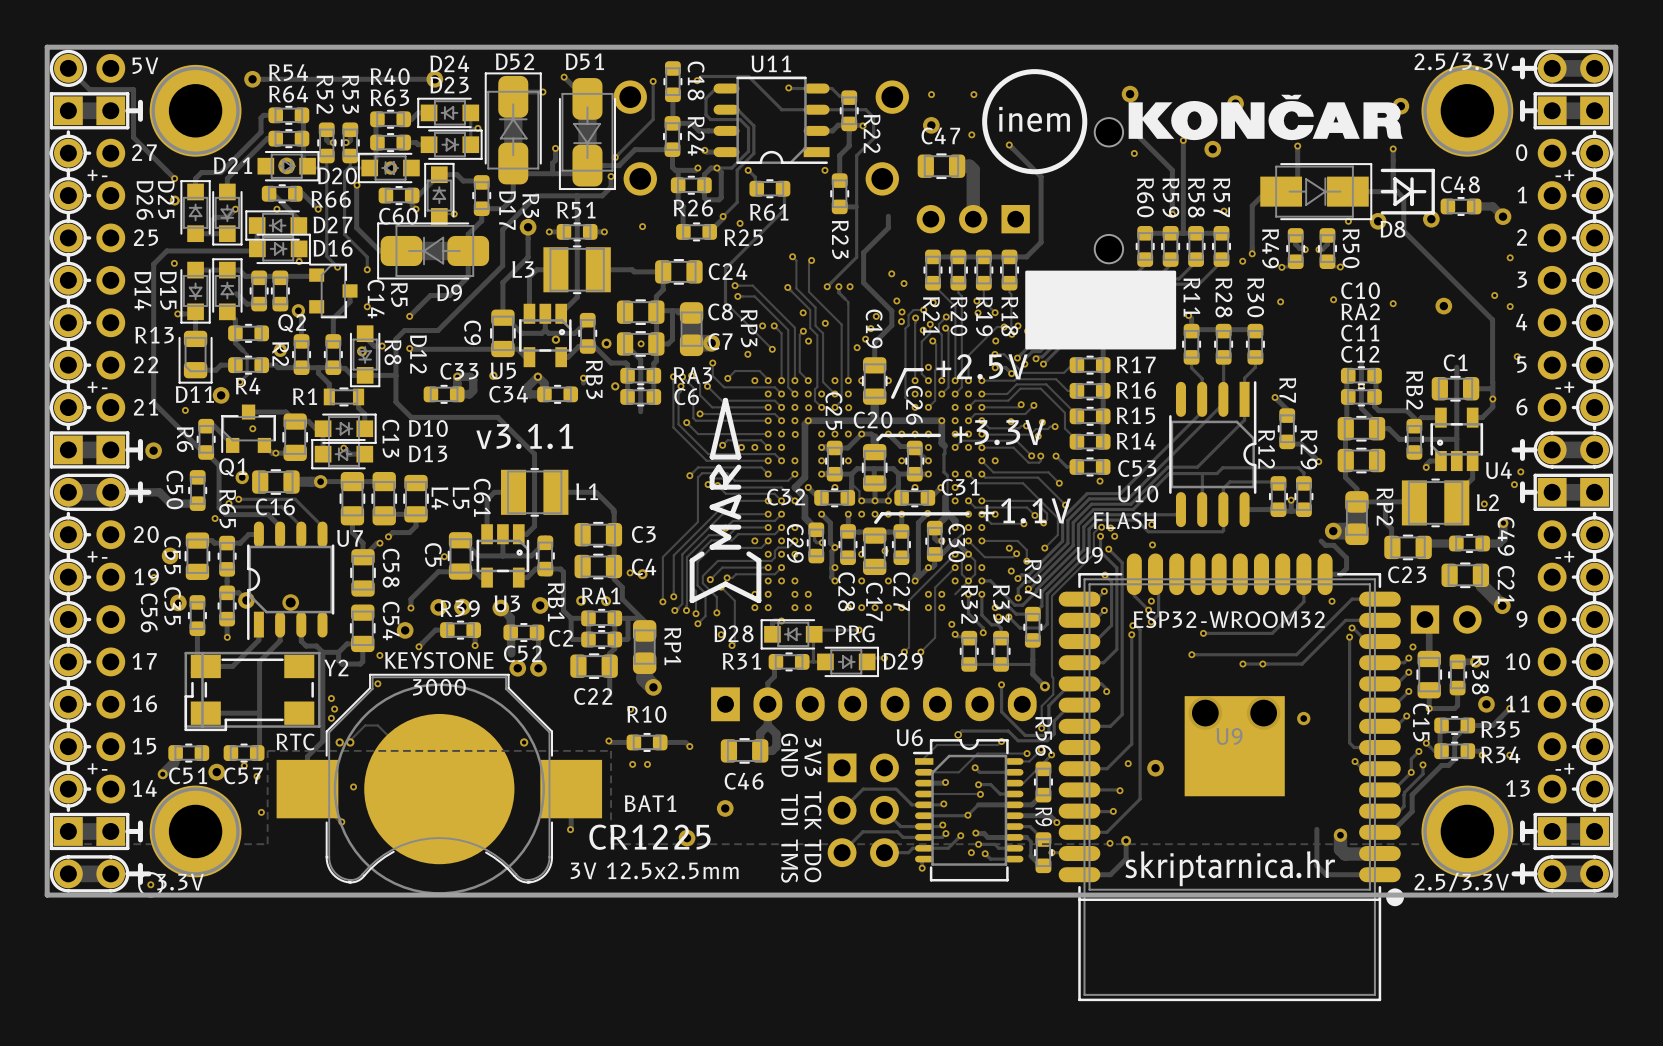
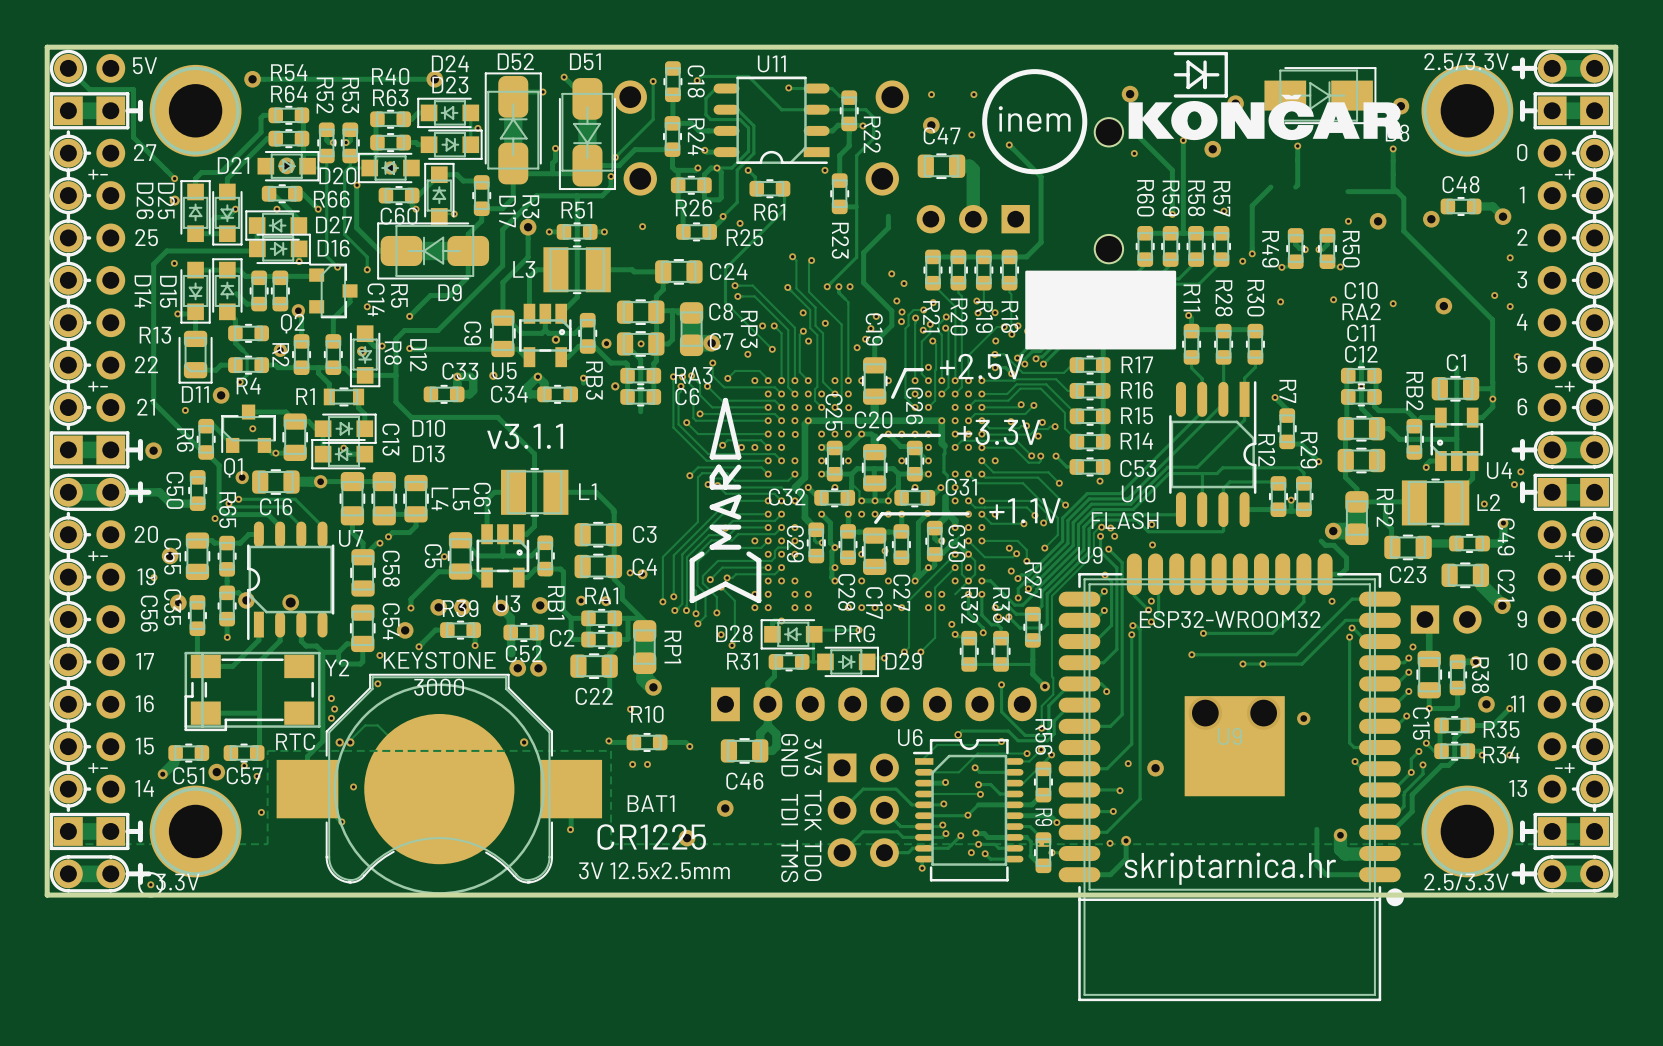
line: (1382, 170) (1433, 170) (1433, 212) (1382, 212) -> (1175, 53) (1226, 53) (1226, 95) (1175, 95)
line: (1412, 178) (1412, 204) -> (1205, 62) (1205, 87)
D8 position: (1316, 191) -> (1320, 95)
line: (1395, 191) (1382, 191) -> (1188, 74) (1175, 74)
line: (1412, 191) (1395, 178) (1395, 204) (1412, 191) -> (1205, 74) (1188, 62) (1188, 87) (1205, 74)
line: (1424, 191) (1412, 191) -> (1217, 74) (1205, 74)

